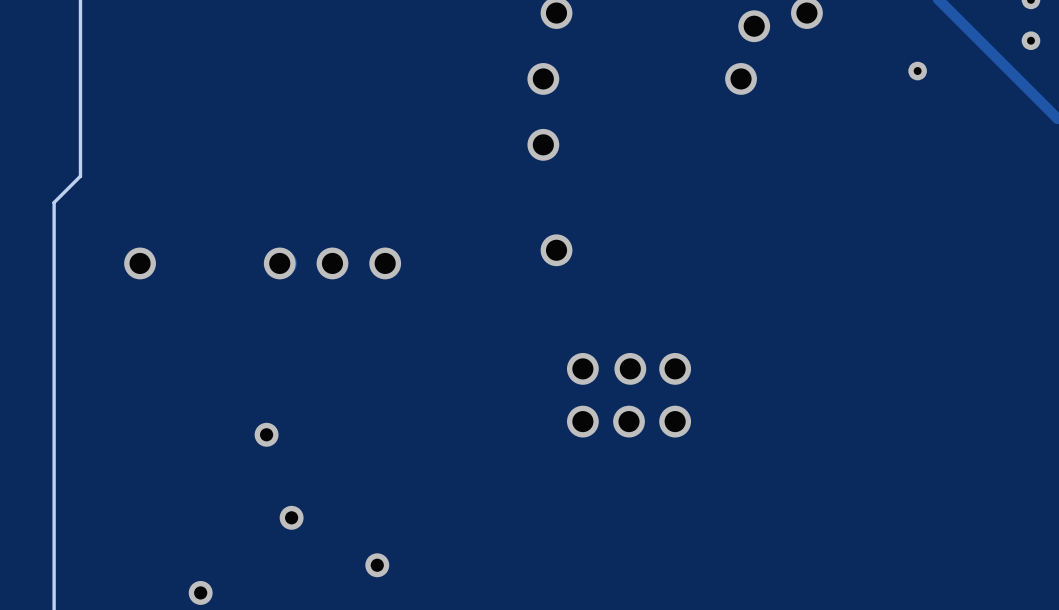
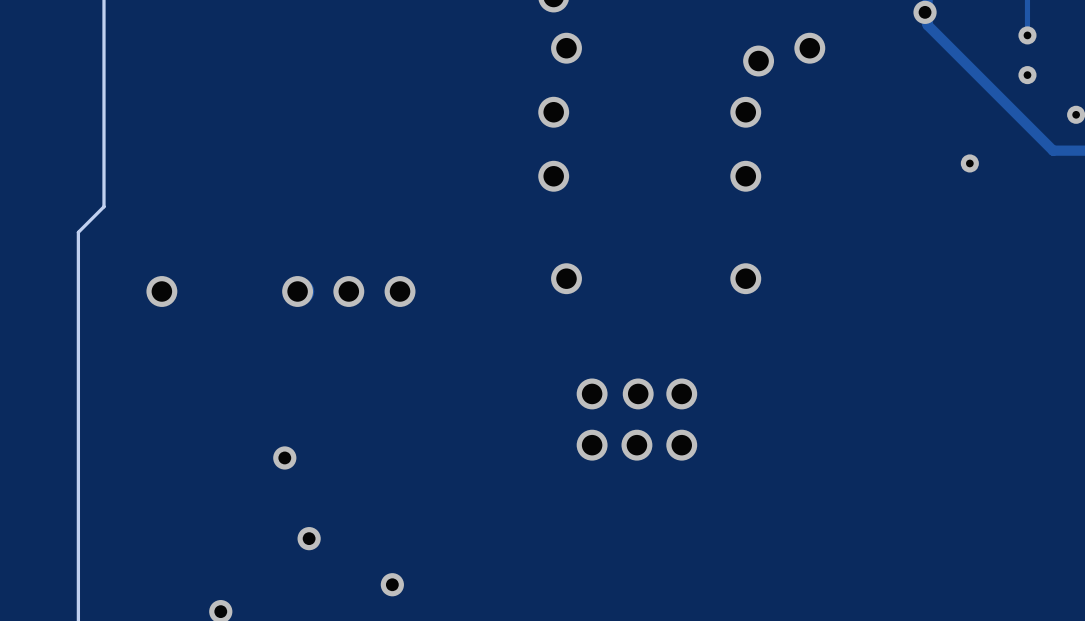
via position: (917, 71) -> (969, 163)
via: none -> (745, 176)
via: none -> (745, 278)

